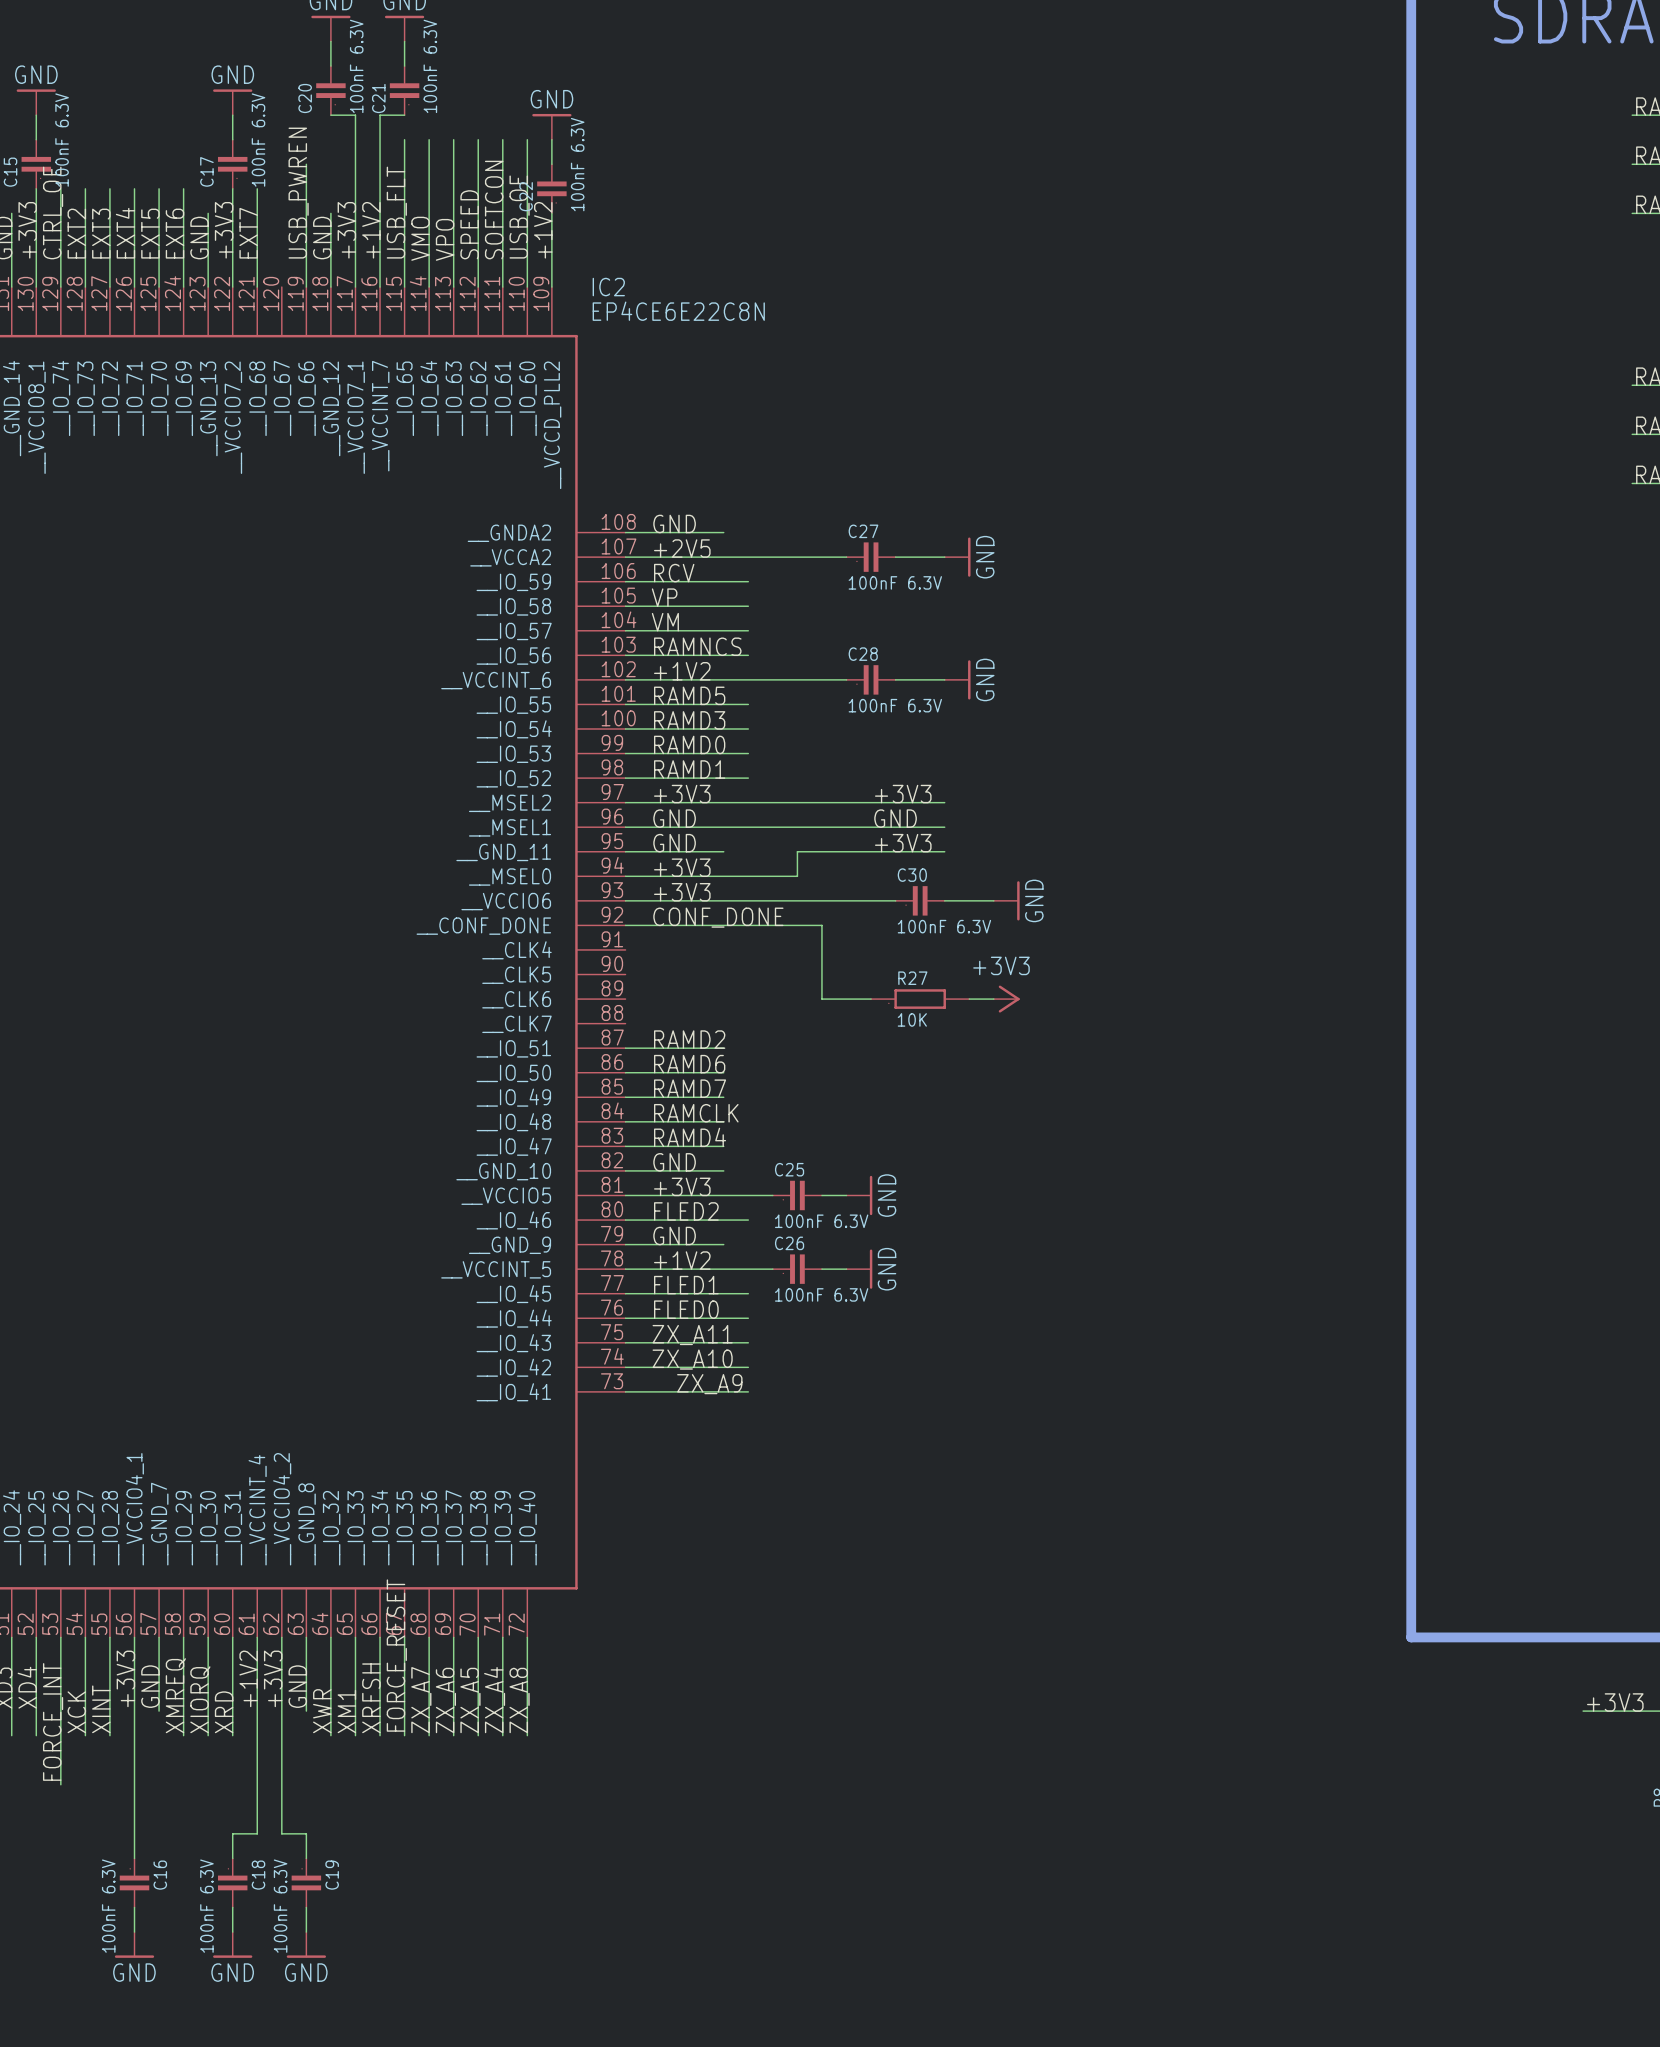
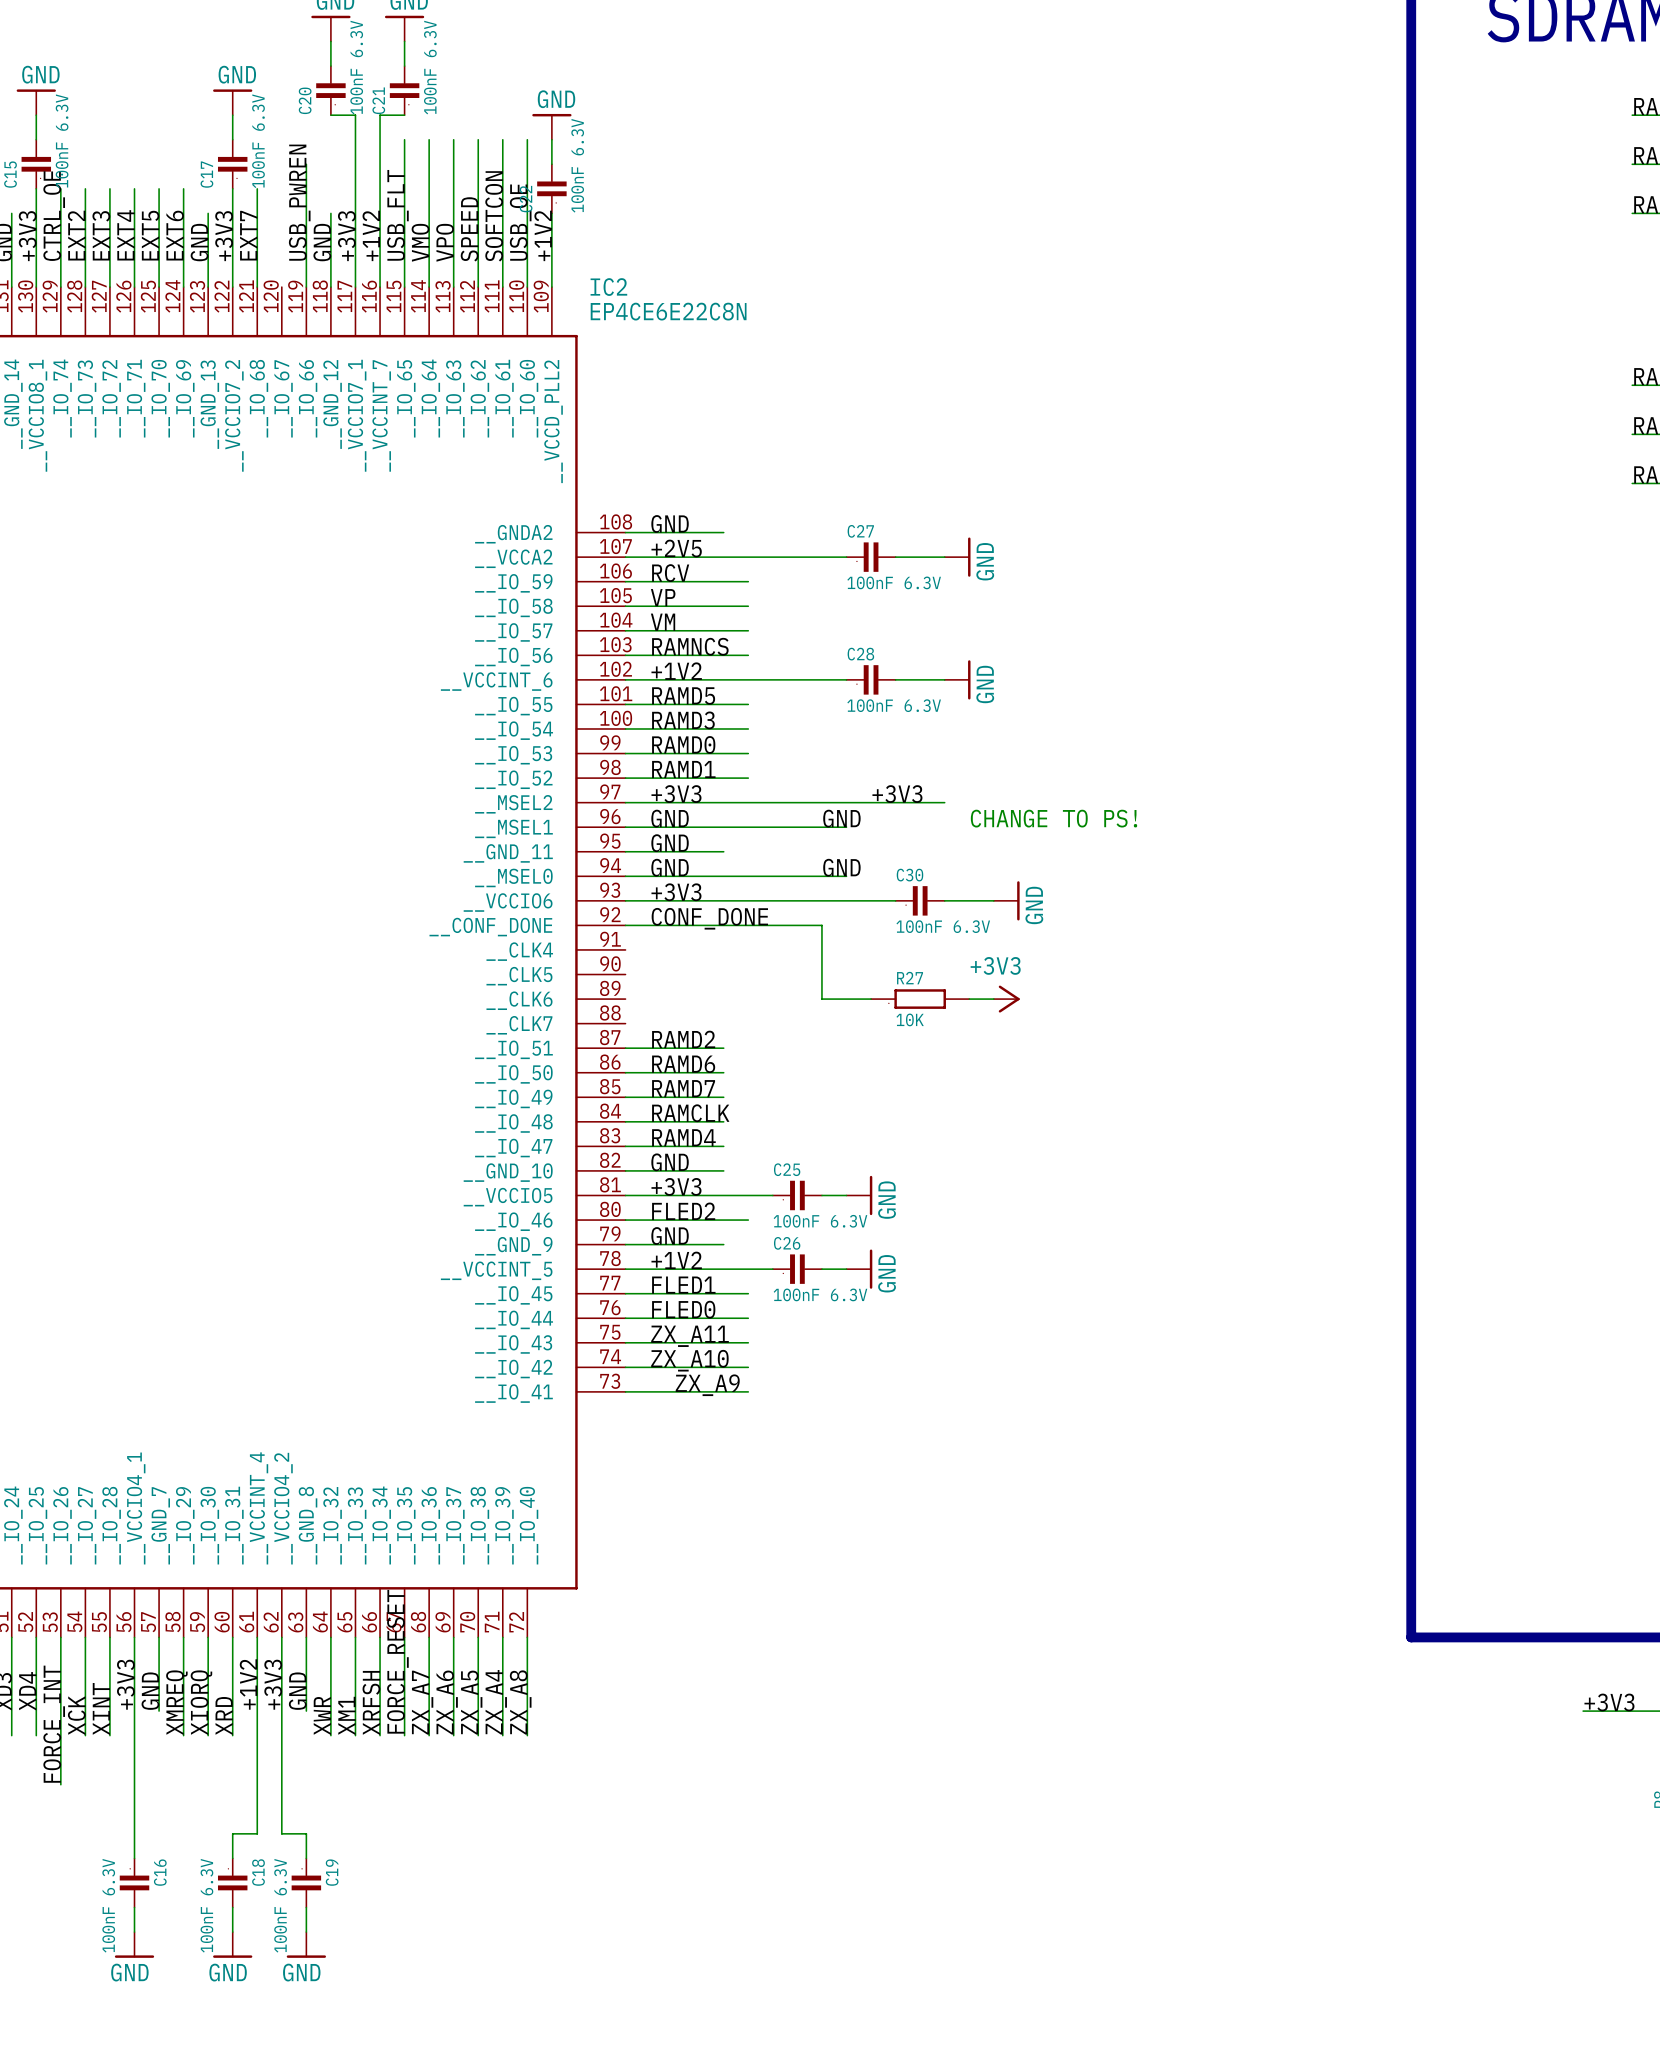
label position: GND (895, 818) -> GND (841, 818)
text: none -> CHANGE TO PS! (1053, 818)
wire: (846, 827) (944, 827) -> none
label: +3V3 (903, 843) -> none
wire: (944, 851) (797, 851) (797, 876) -> (846, 876) (797, 876)
label: +3V3 (682, 867) -> GND (670, 867)
label: none -> GND (841, 867)

